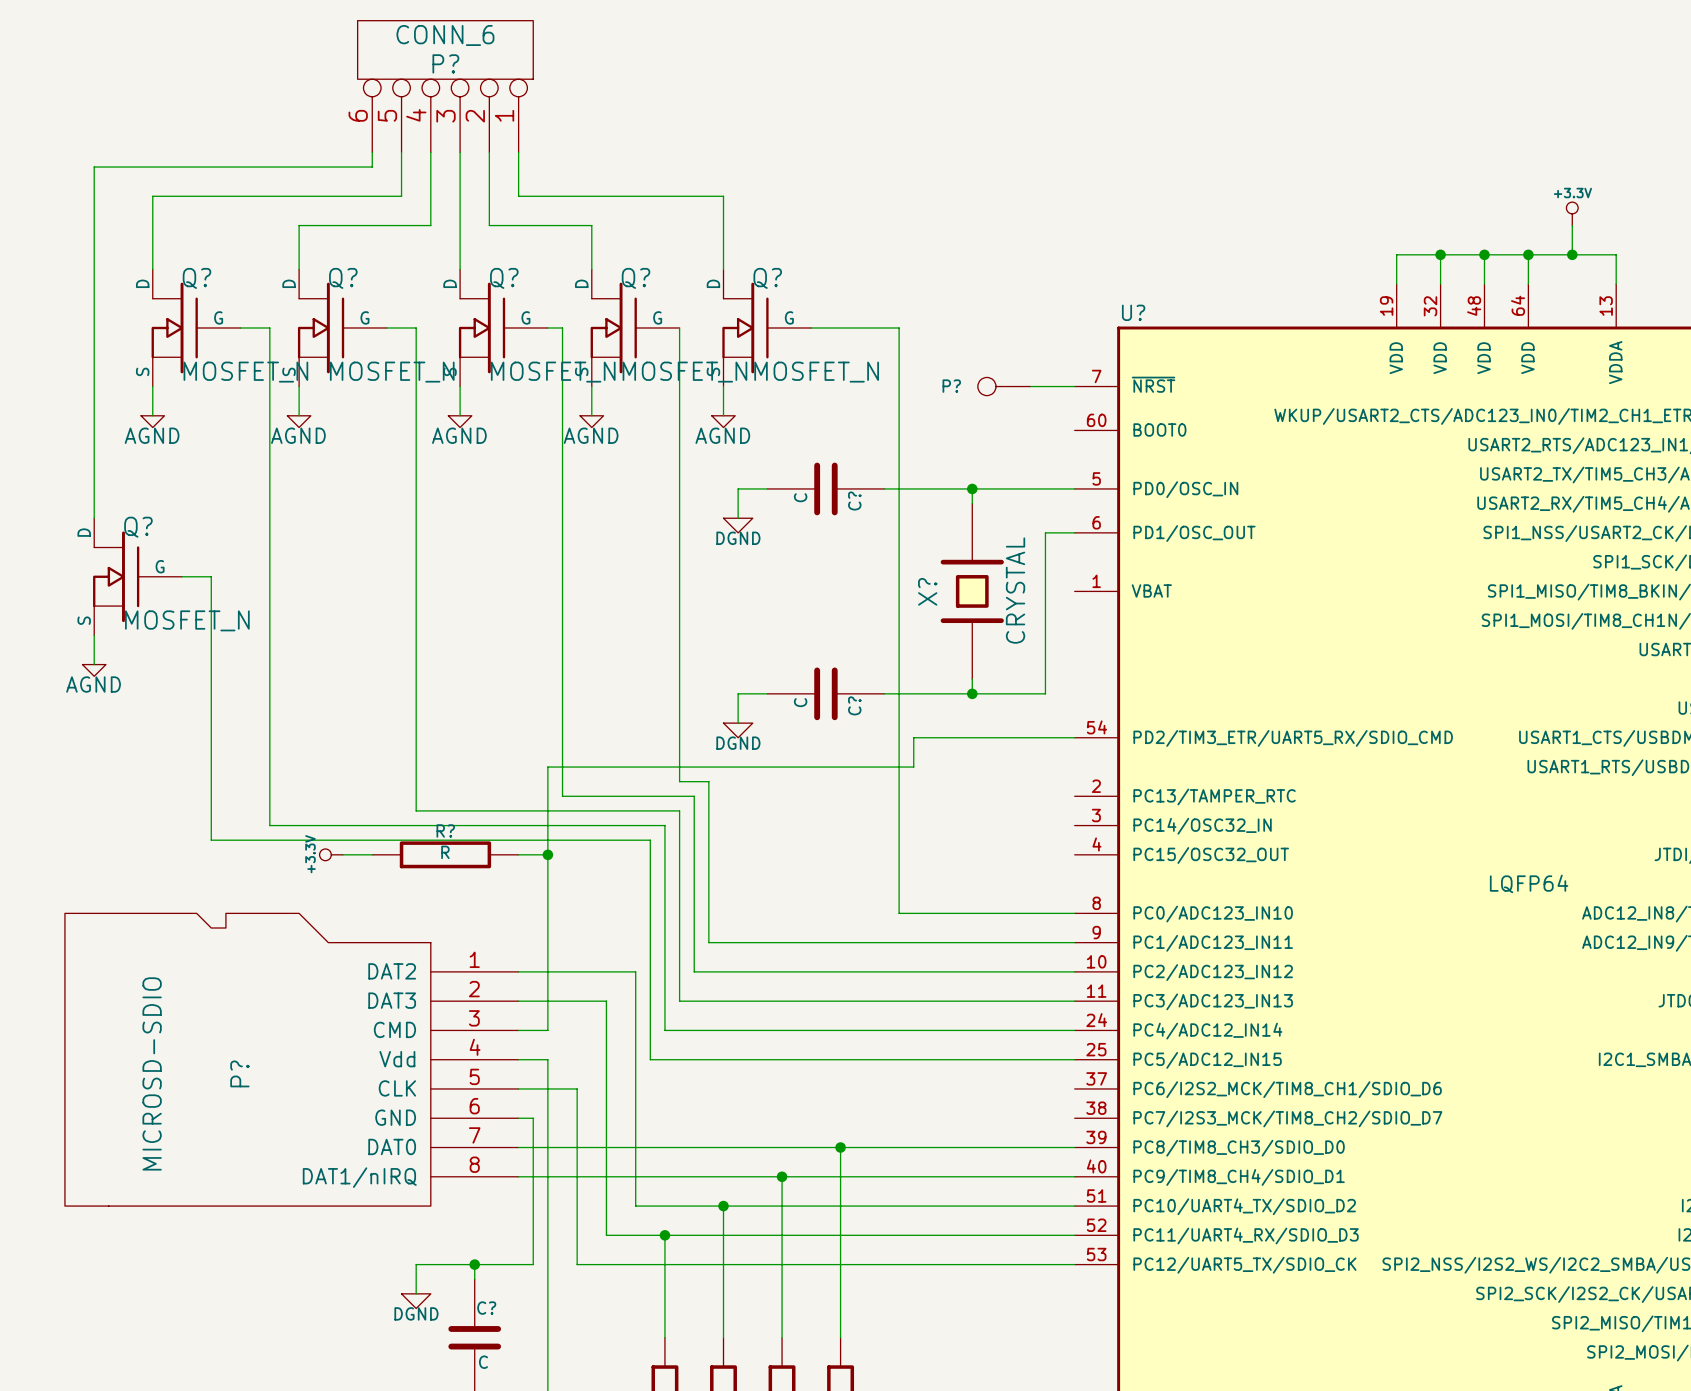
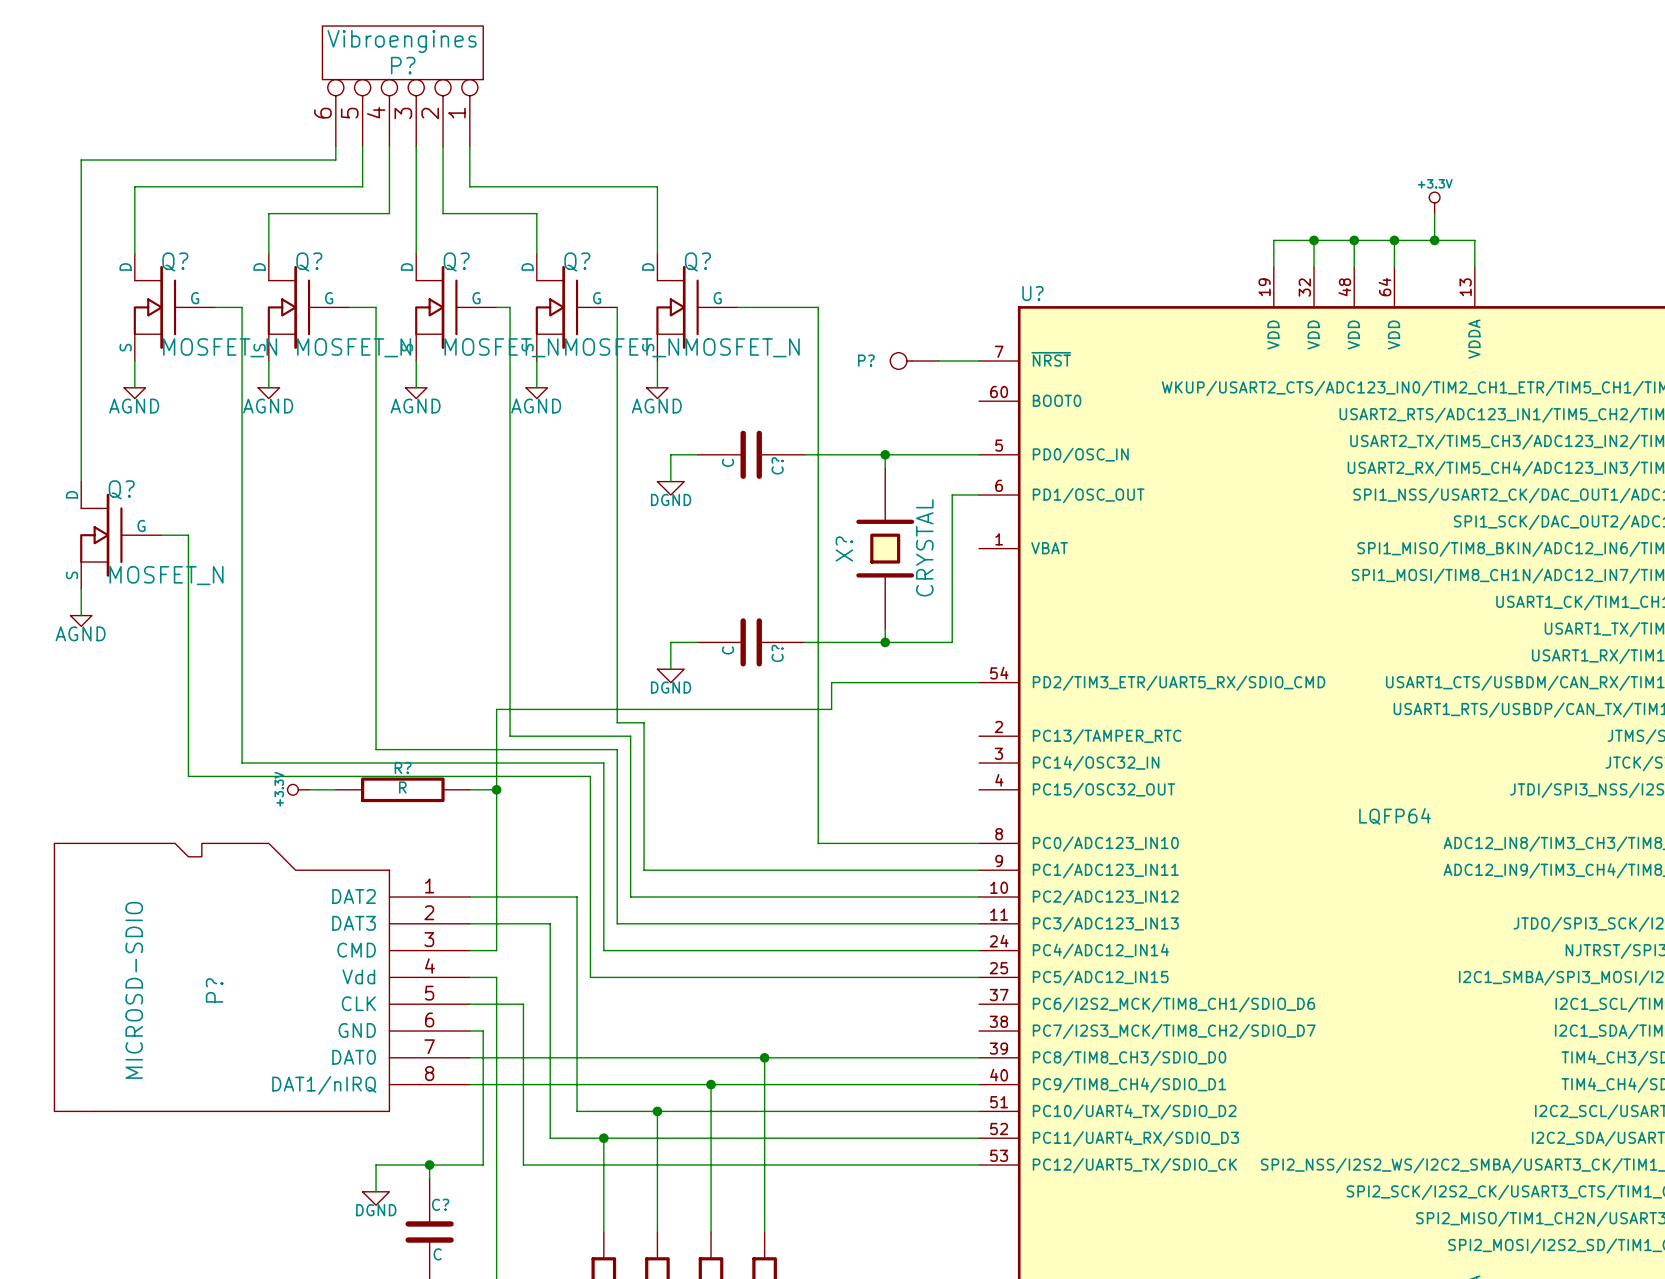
P? value: CONN_6 (445, 35) -> Vibroengines (402, 41)

